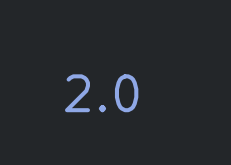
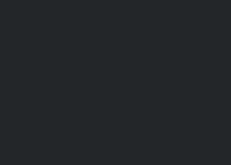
text: 2.0 (101, 93) -> none

